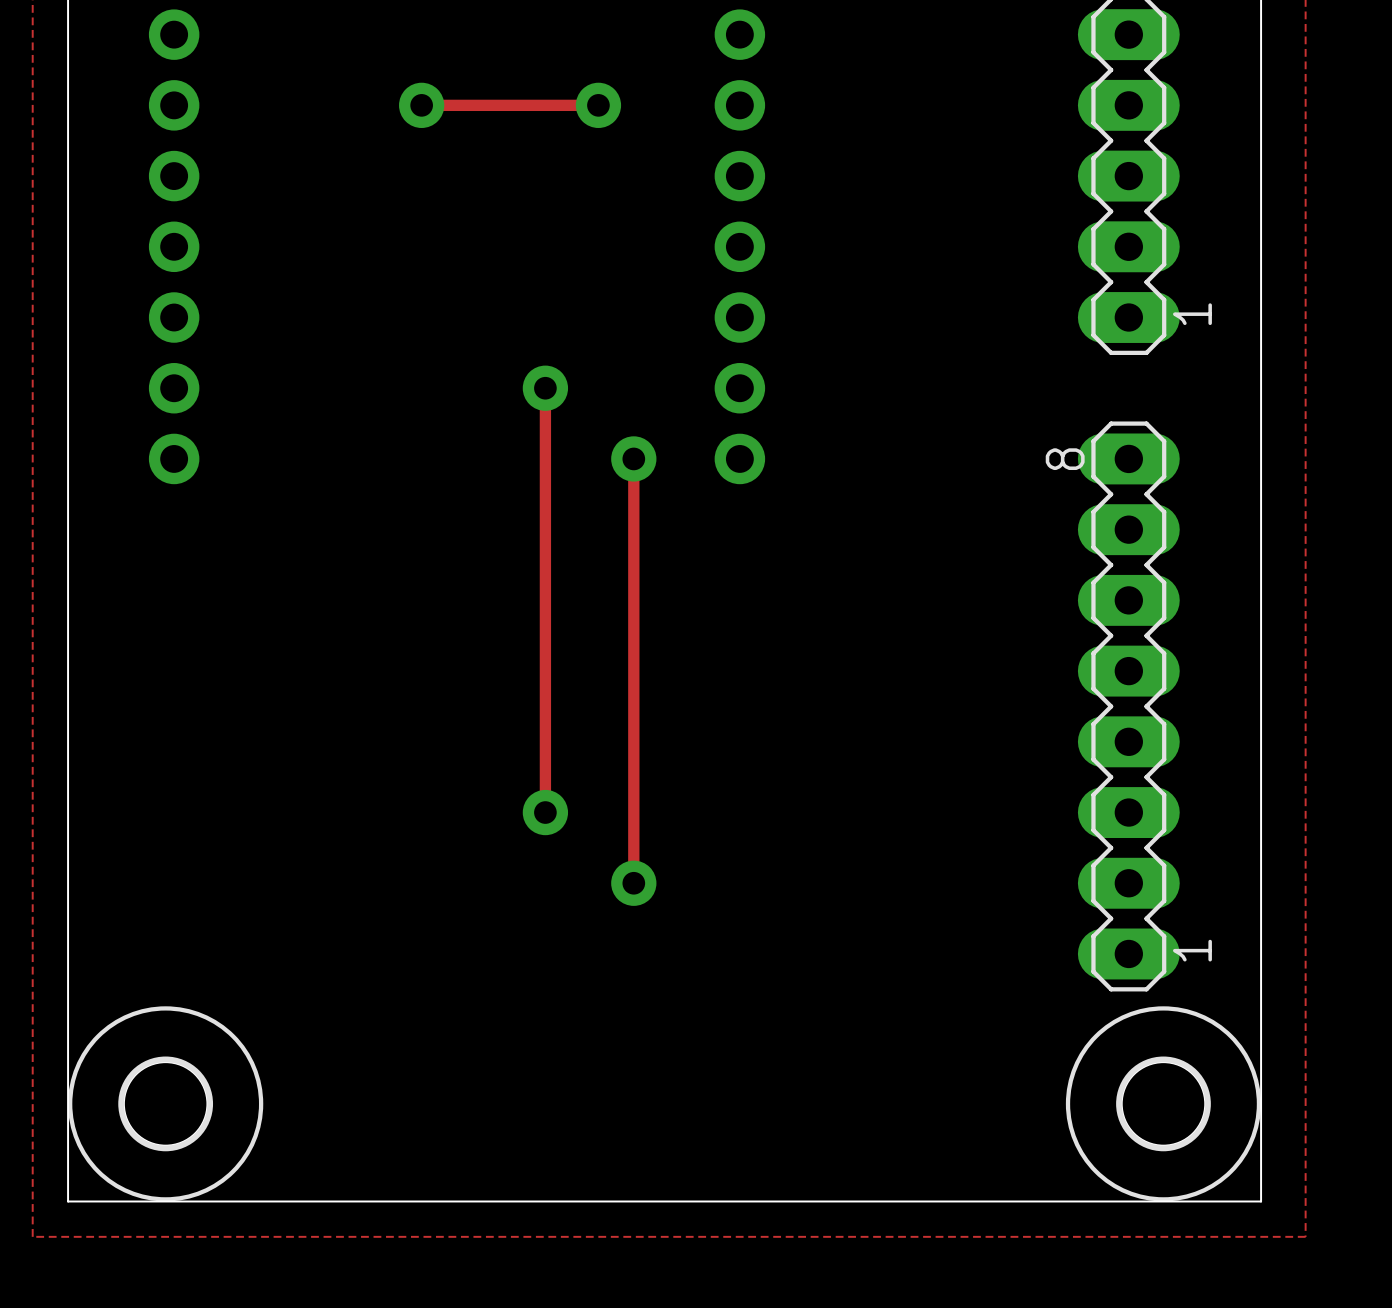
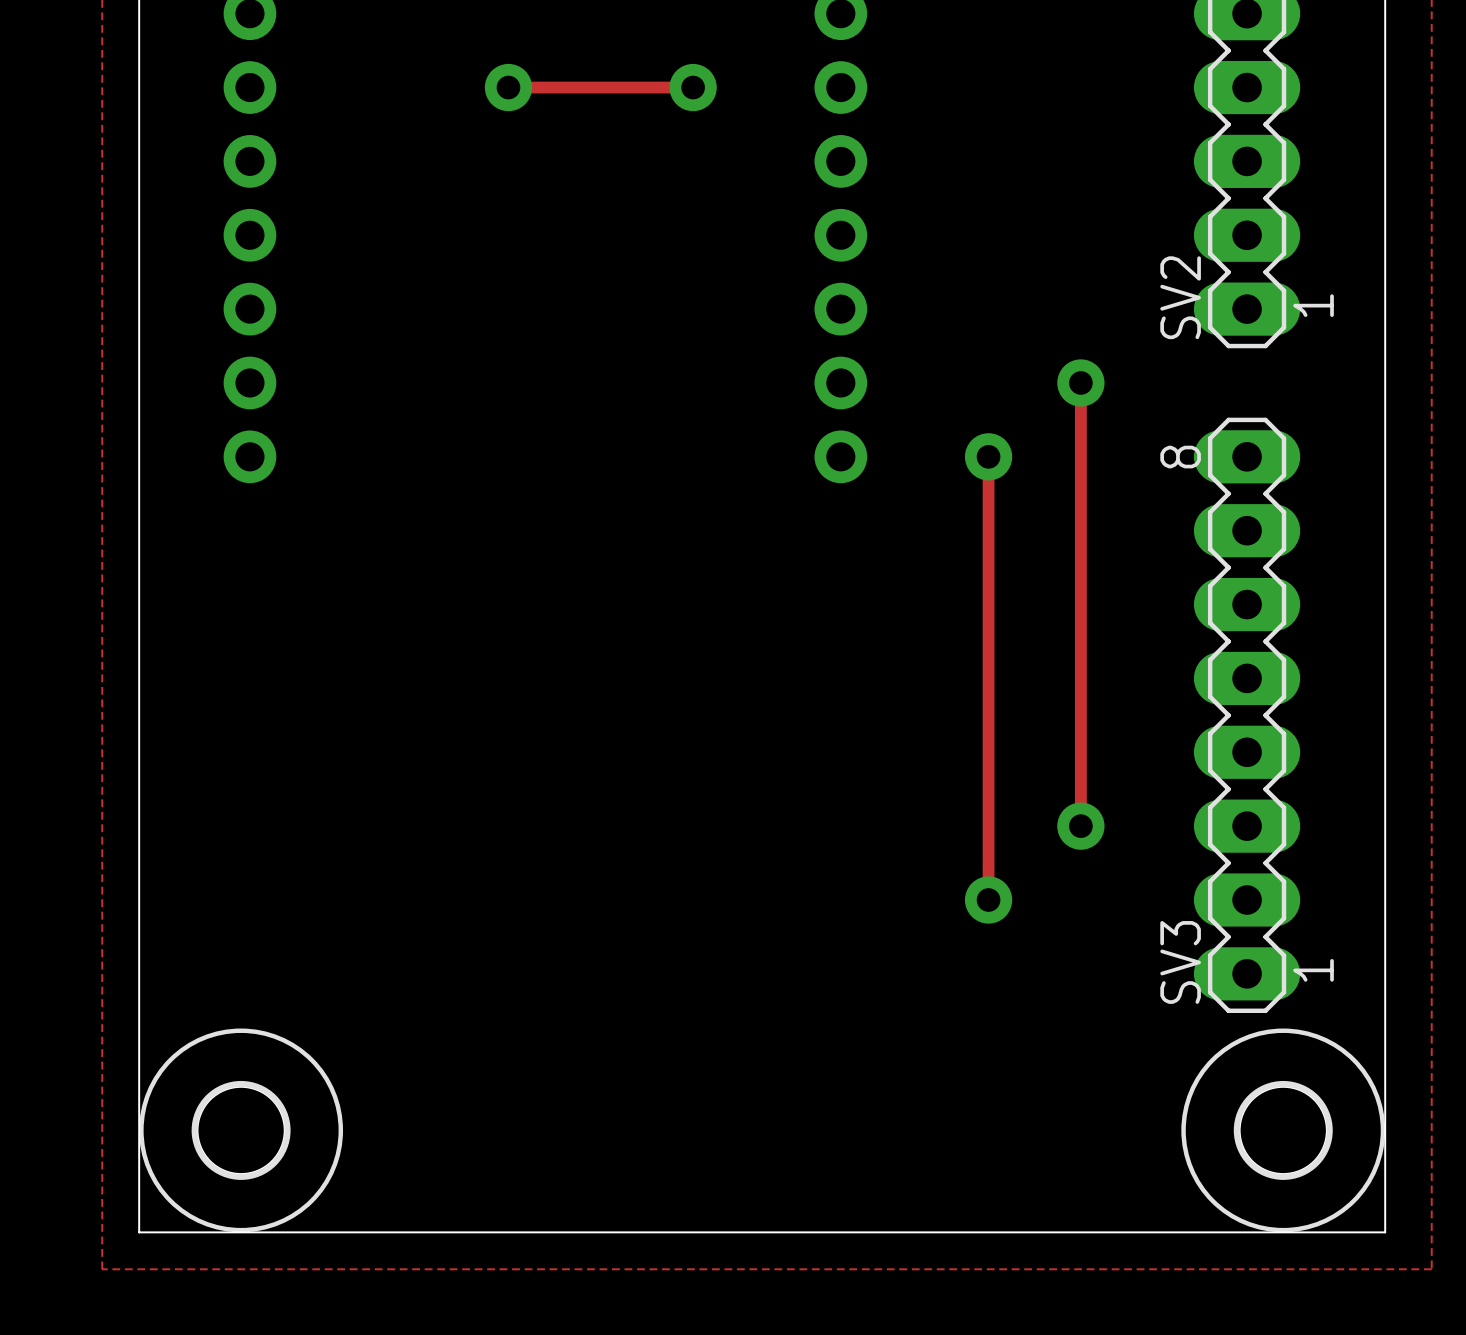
SV2 name: none -> SV2 (1180, 297)
track: (545, 388) (545, 812) -> (1080, 382) (1080, 826)
via: (545, 388) -> none
via: none -> (1080, 382)
track: (633, 458) (633, 883) -> (988, 456) (988, 900)
via: (633, 458) -> none
via: none -> (988, 456)
via: (545, 812) -> none
via: none -> (1080, 826)
via: (633, 883) -> none
via: none -> (988, 900)
SV3 name: none -> SV3 (1180, 962)

